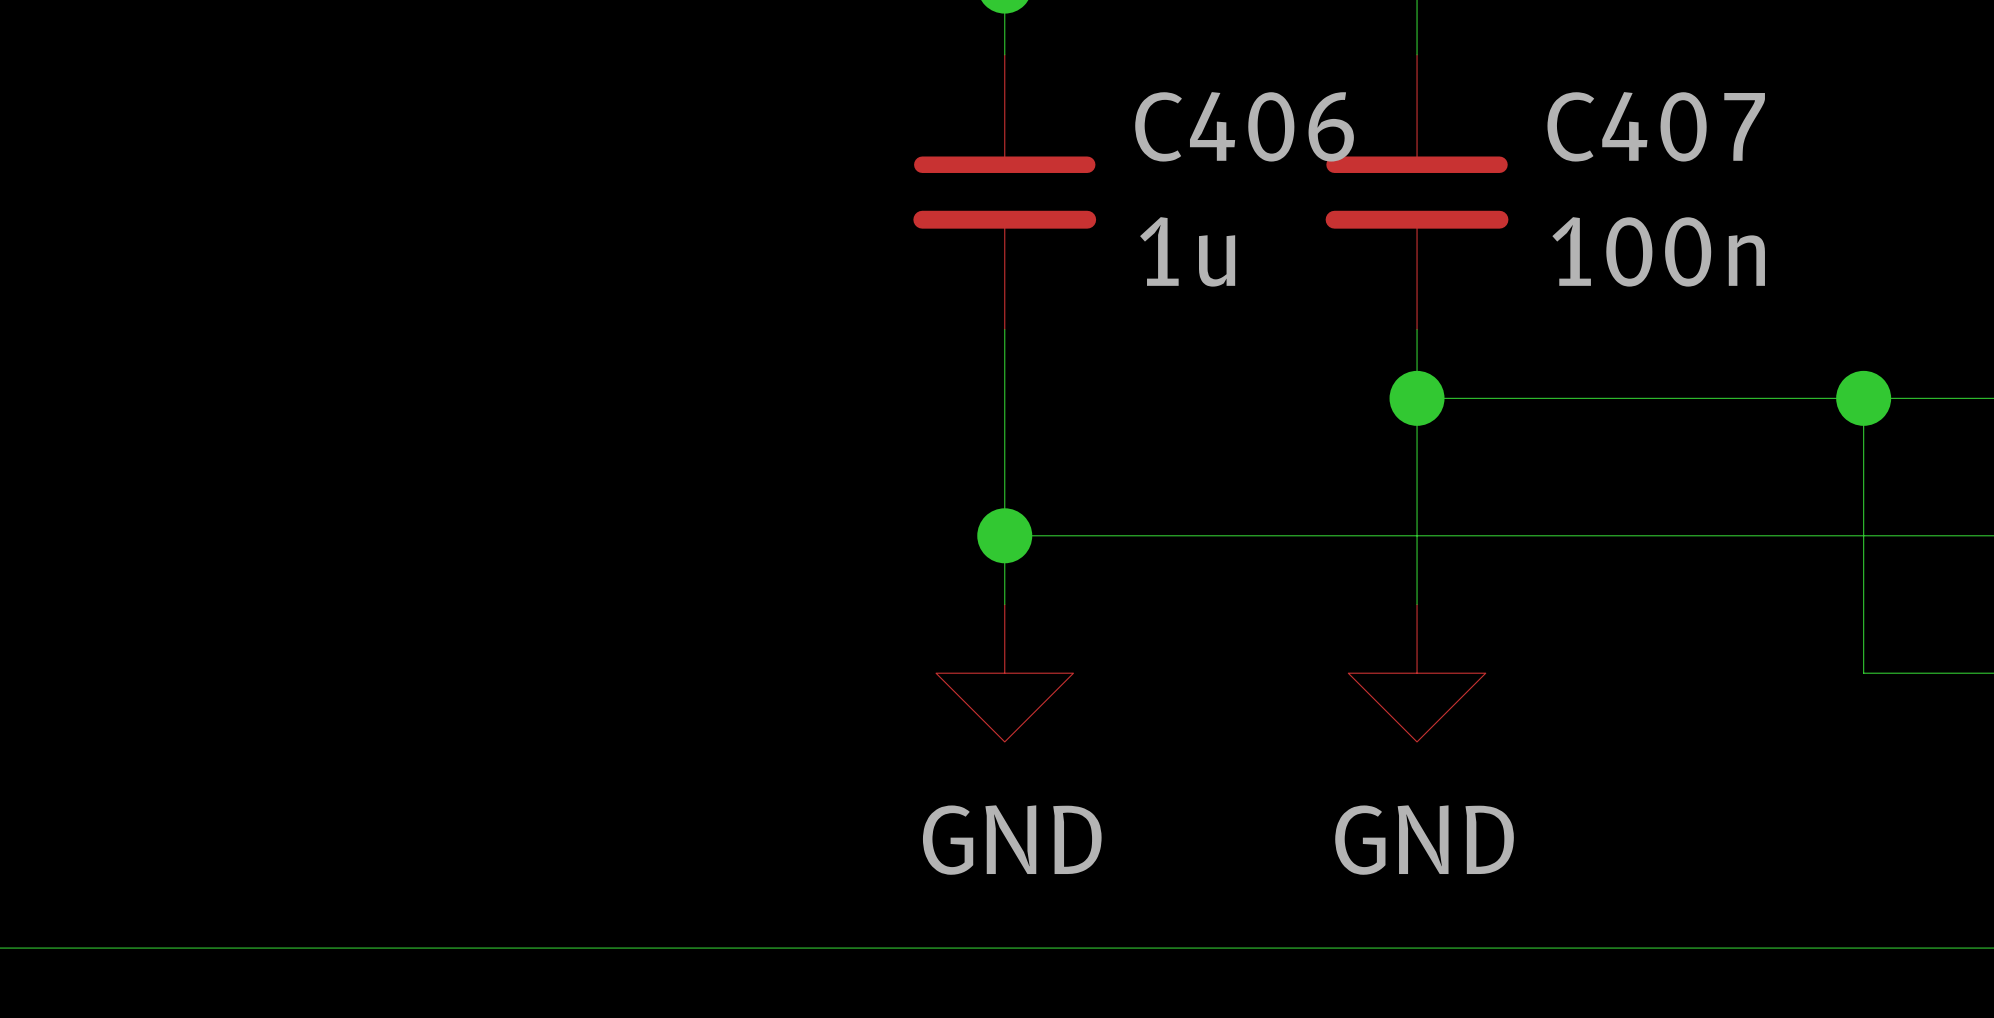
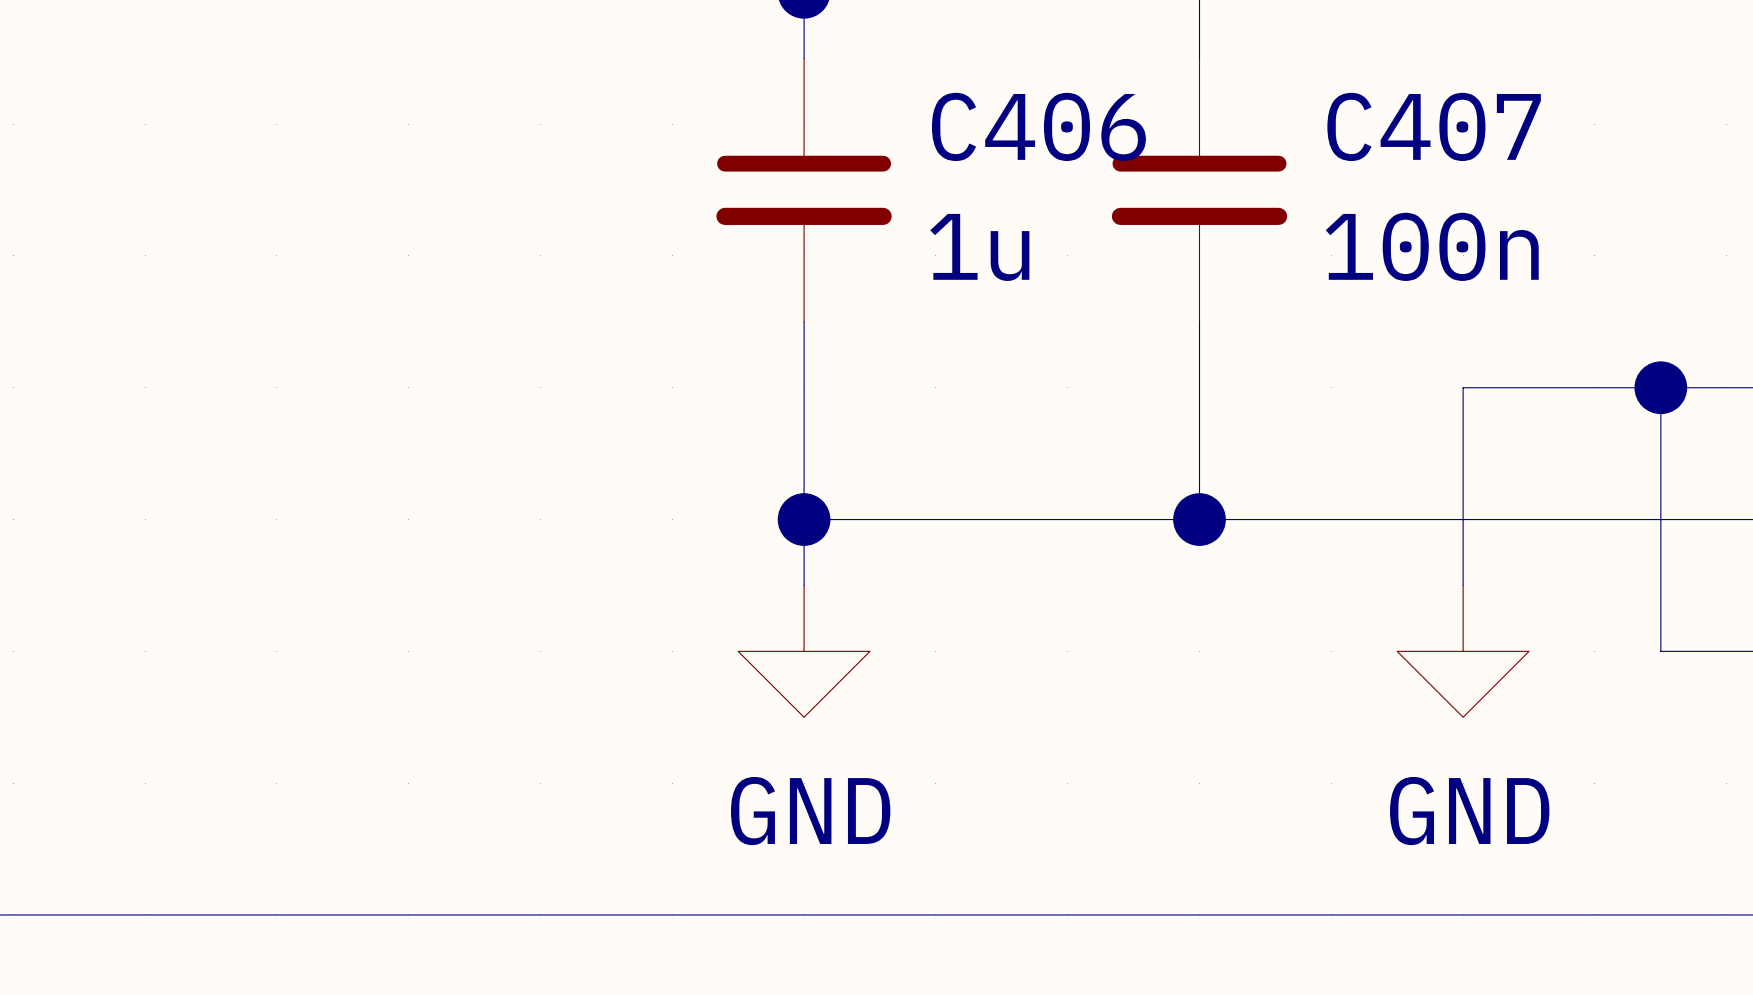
wire: (1417, 398) (1691, 398) -> (1463, 585) (1463, 387)
junction position: (1417, 398) -> (1199, 519)
wire: (1863, 398) (1863, 673) (1898, 673) -> (1660, 387) (1660, 651)
junction position: (1863, 398) -> (1660, 387)
wire: (1417, 535) (1417, 604) -> none
power symbol position: GND (1417, 673) -> GND (1463, 651)

